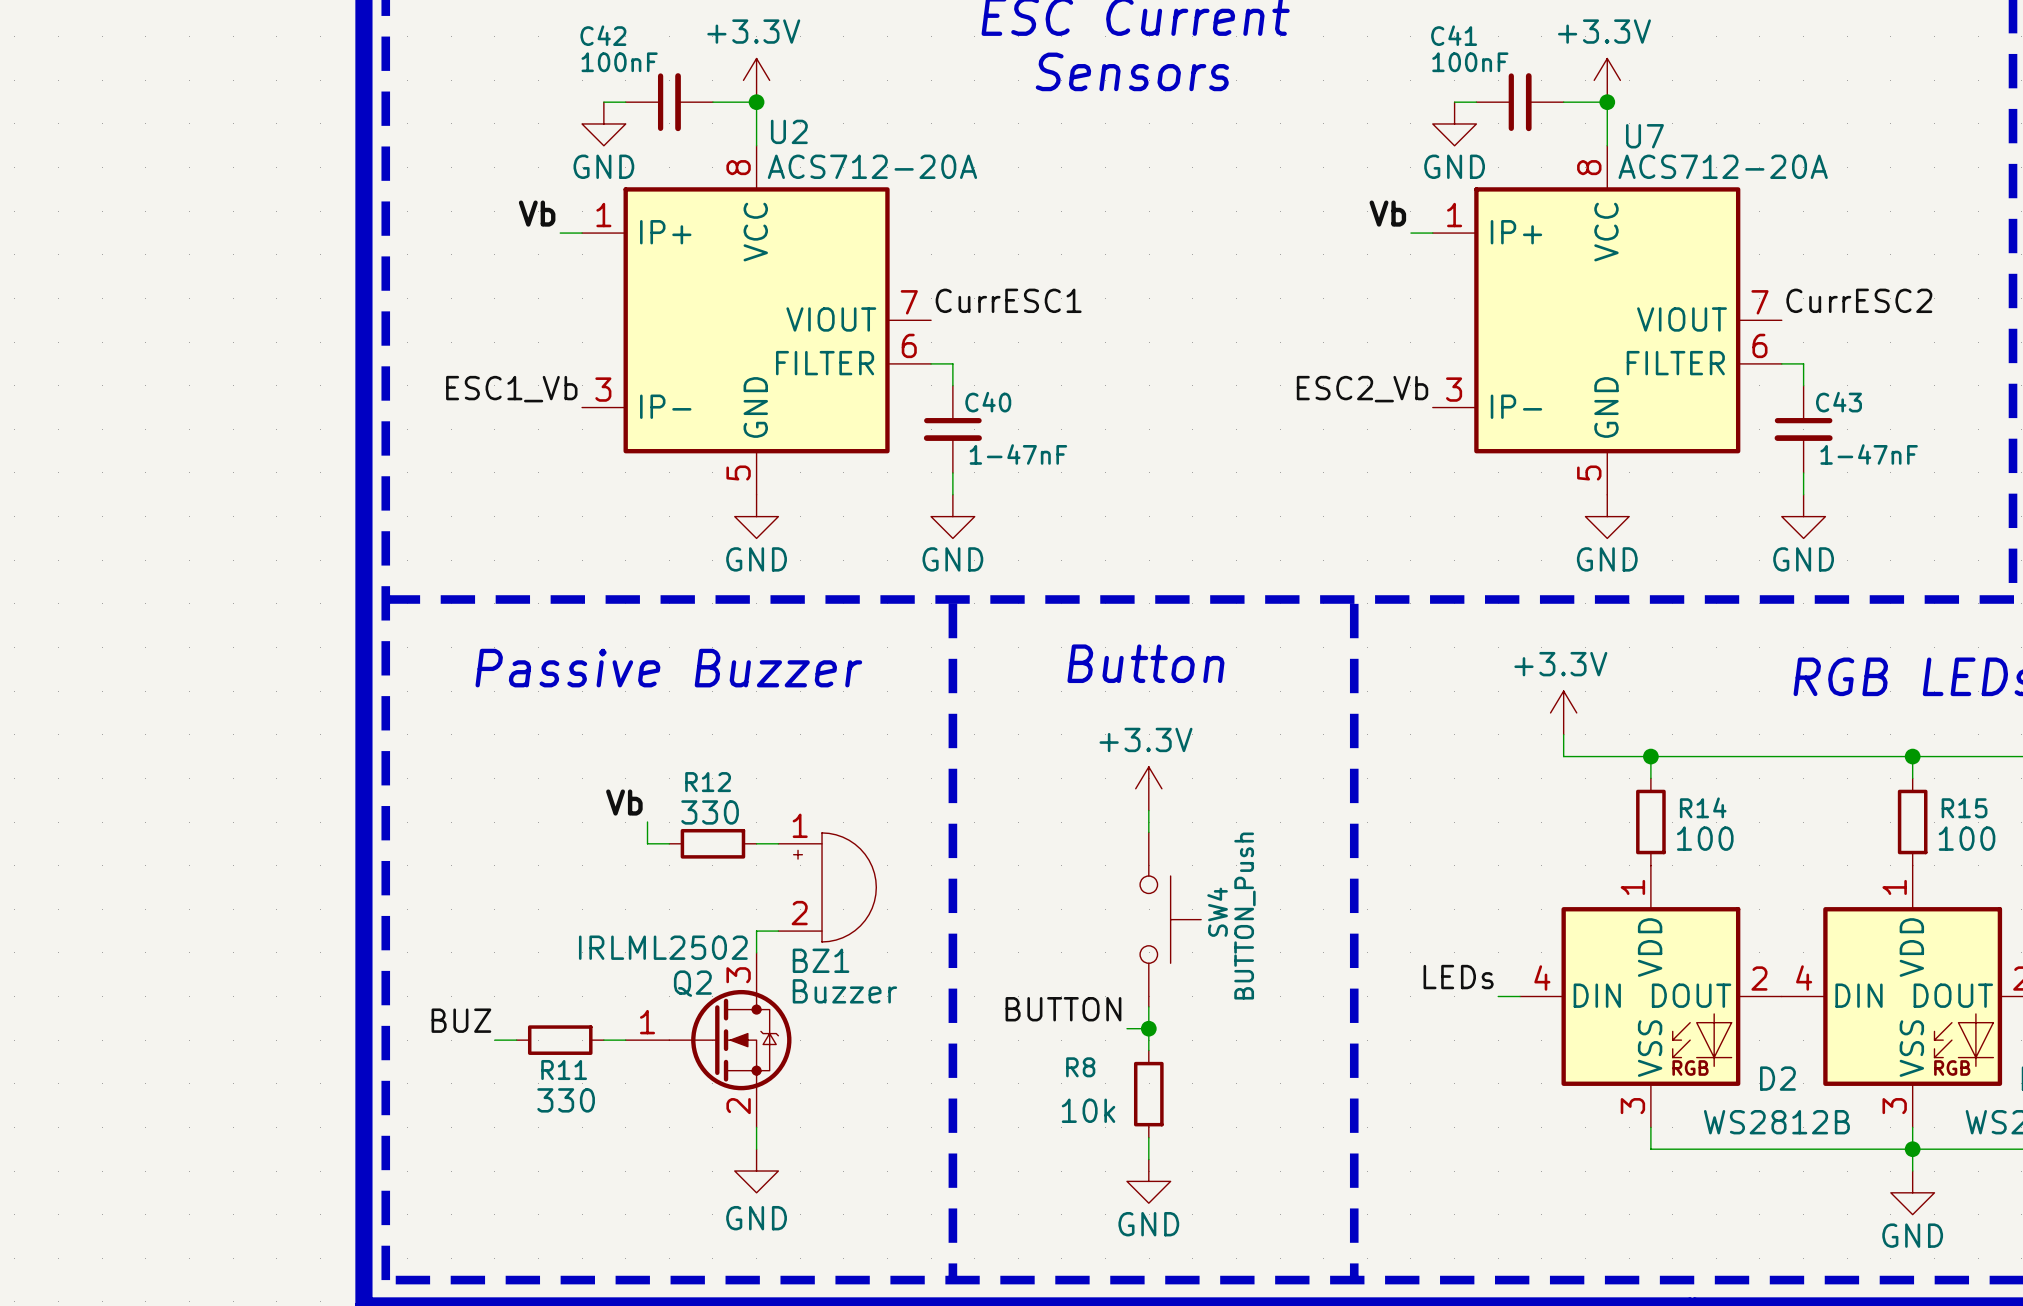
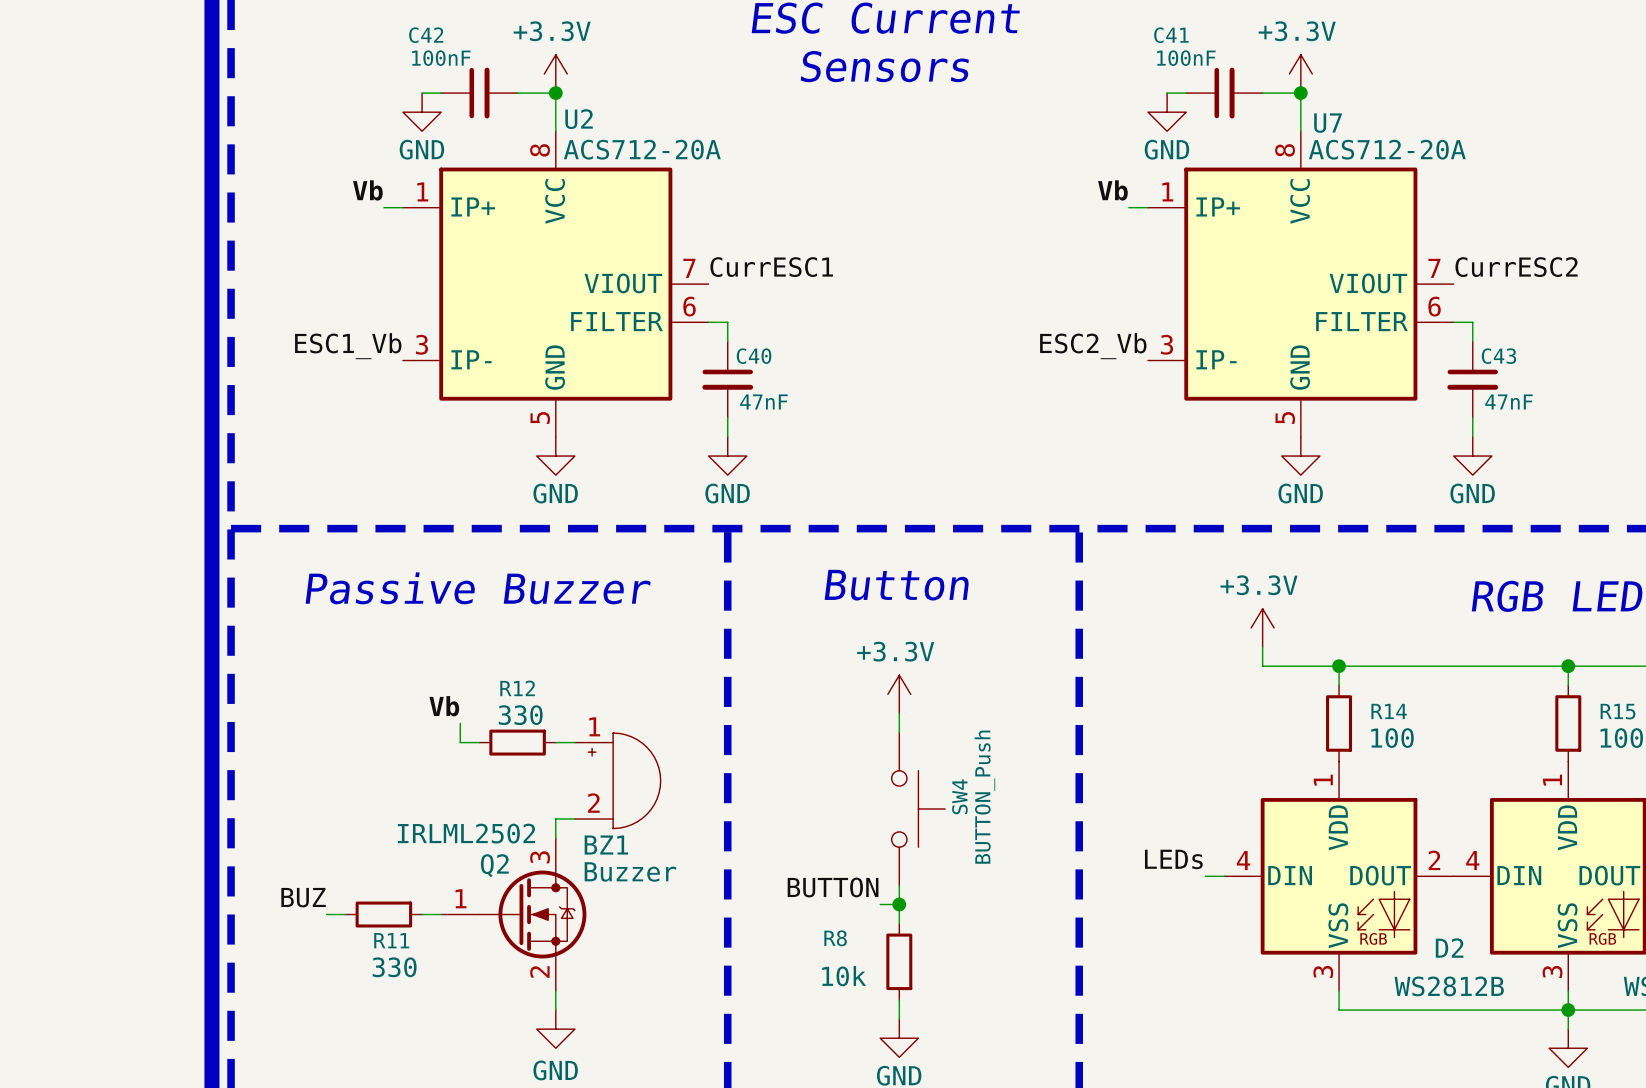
C40 value: 1-47nF (1018, 454) -> 47nF (763, 401)
C43 value: 1-47nF (1869, 454) -> 47nF (1508, 401)

